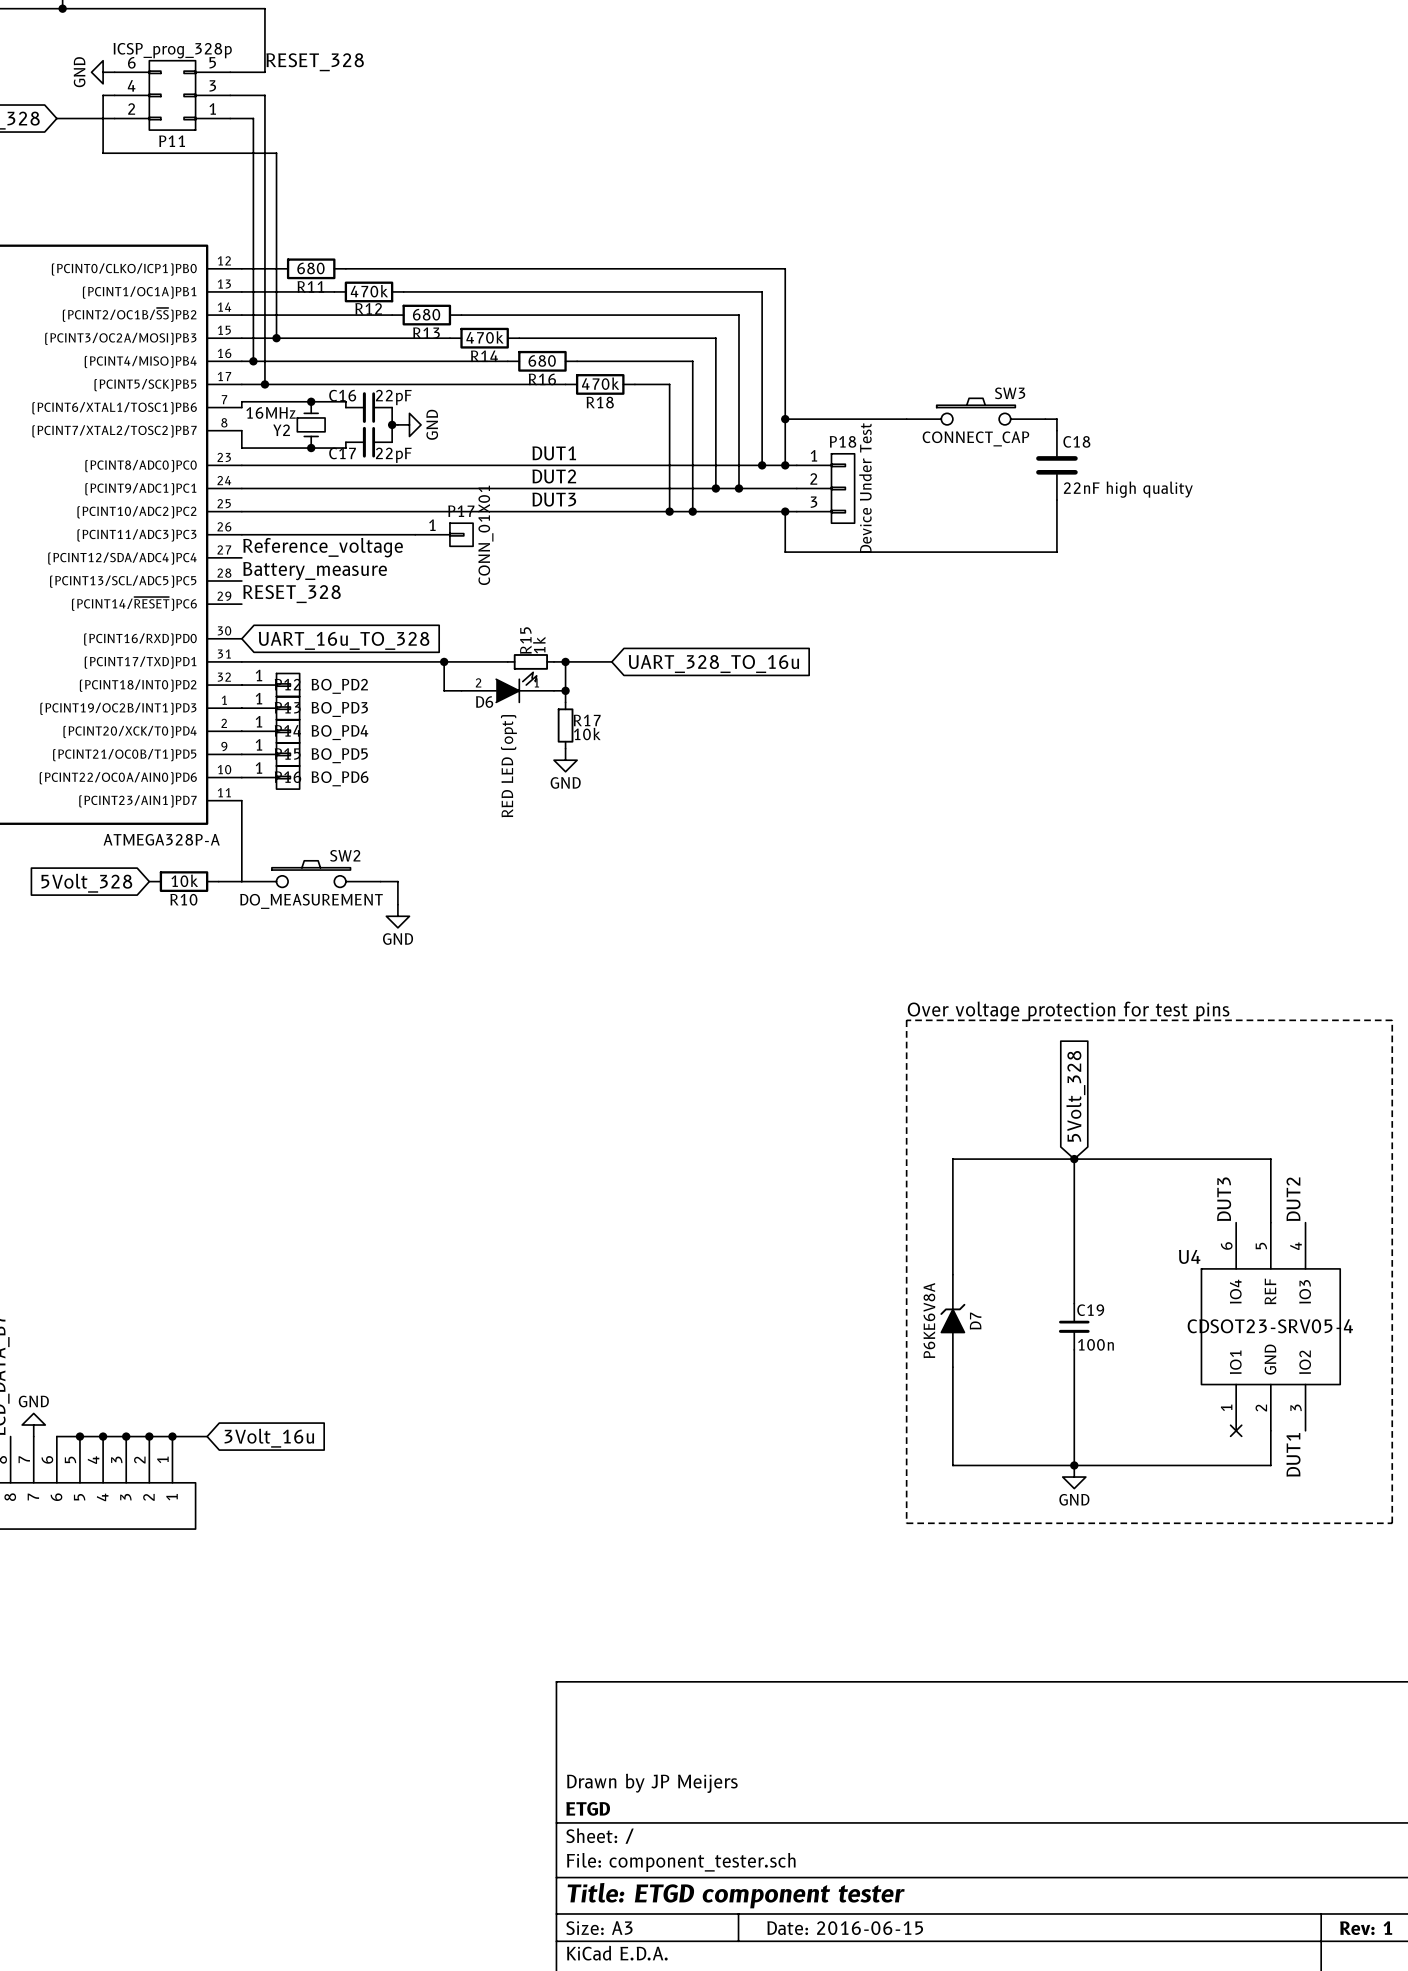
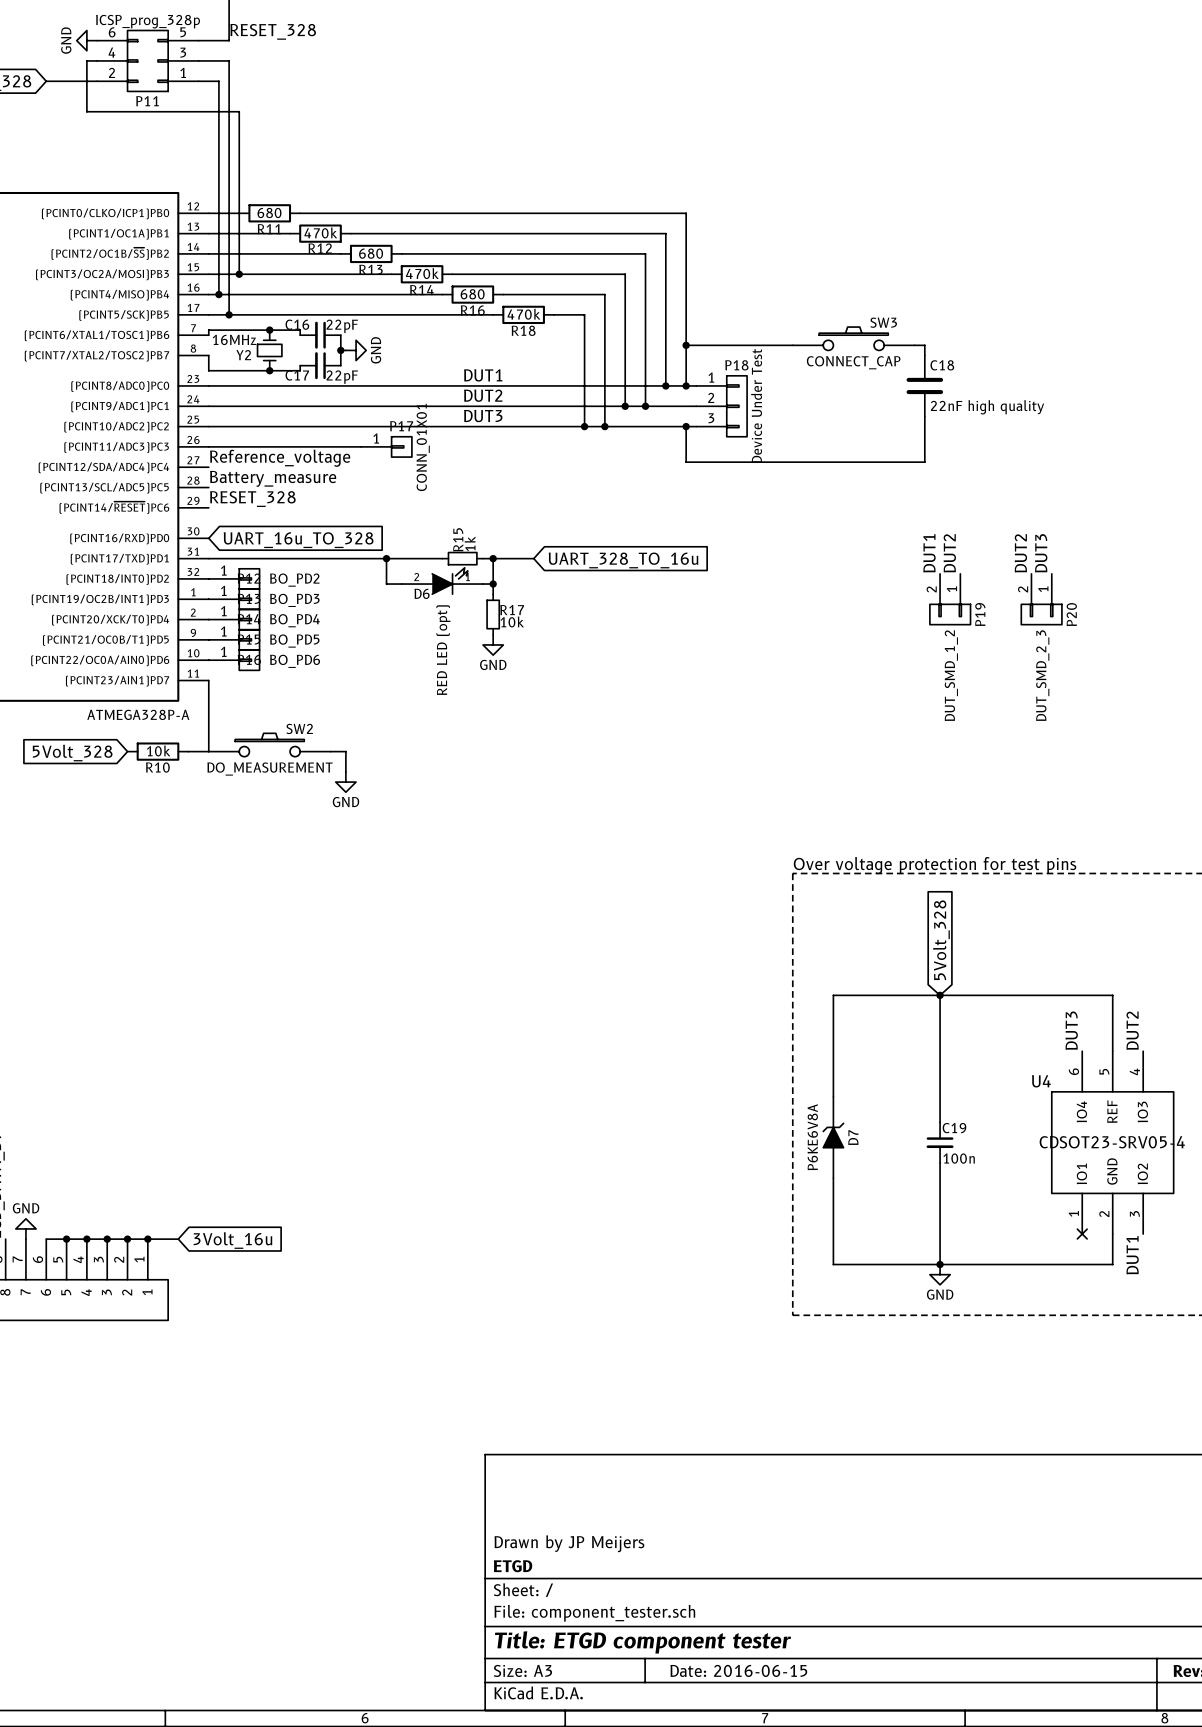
label: none -> DUT1 (929, 553)
label: none -> DUT2 (949, 553)
label: none -> DUT2 (1020, 553)
label: none -> DUT3 (1041, 553)
P19: none -> DUT_SMD_1_2 (950, 599)
P20: none -> DUT_SMD_2_3 (1041, 599)

